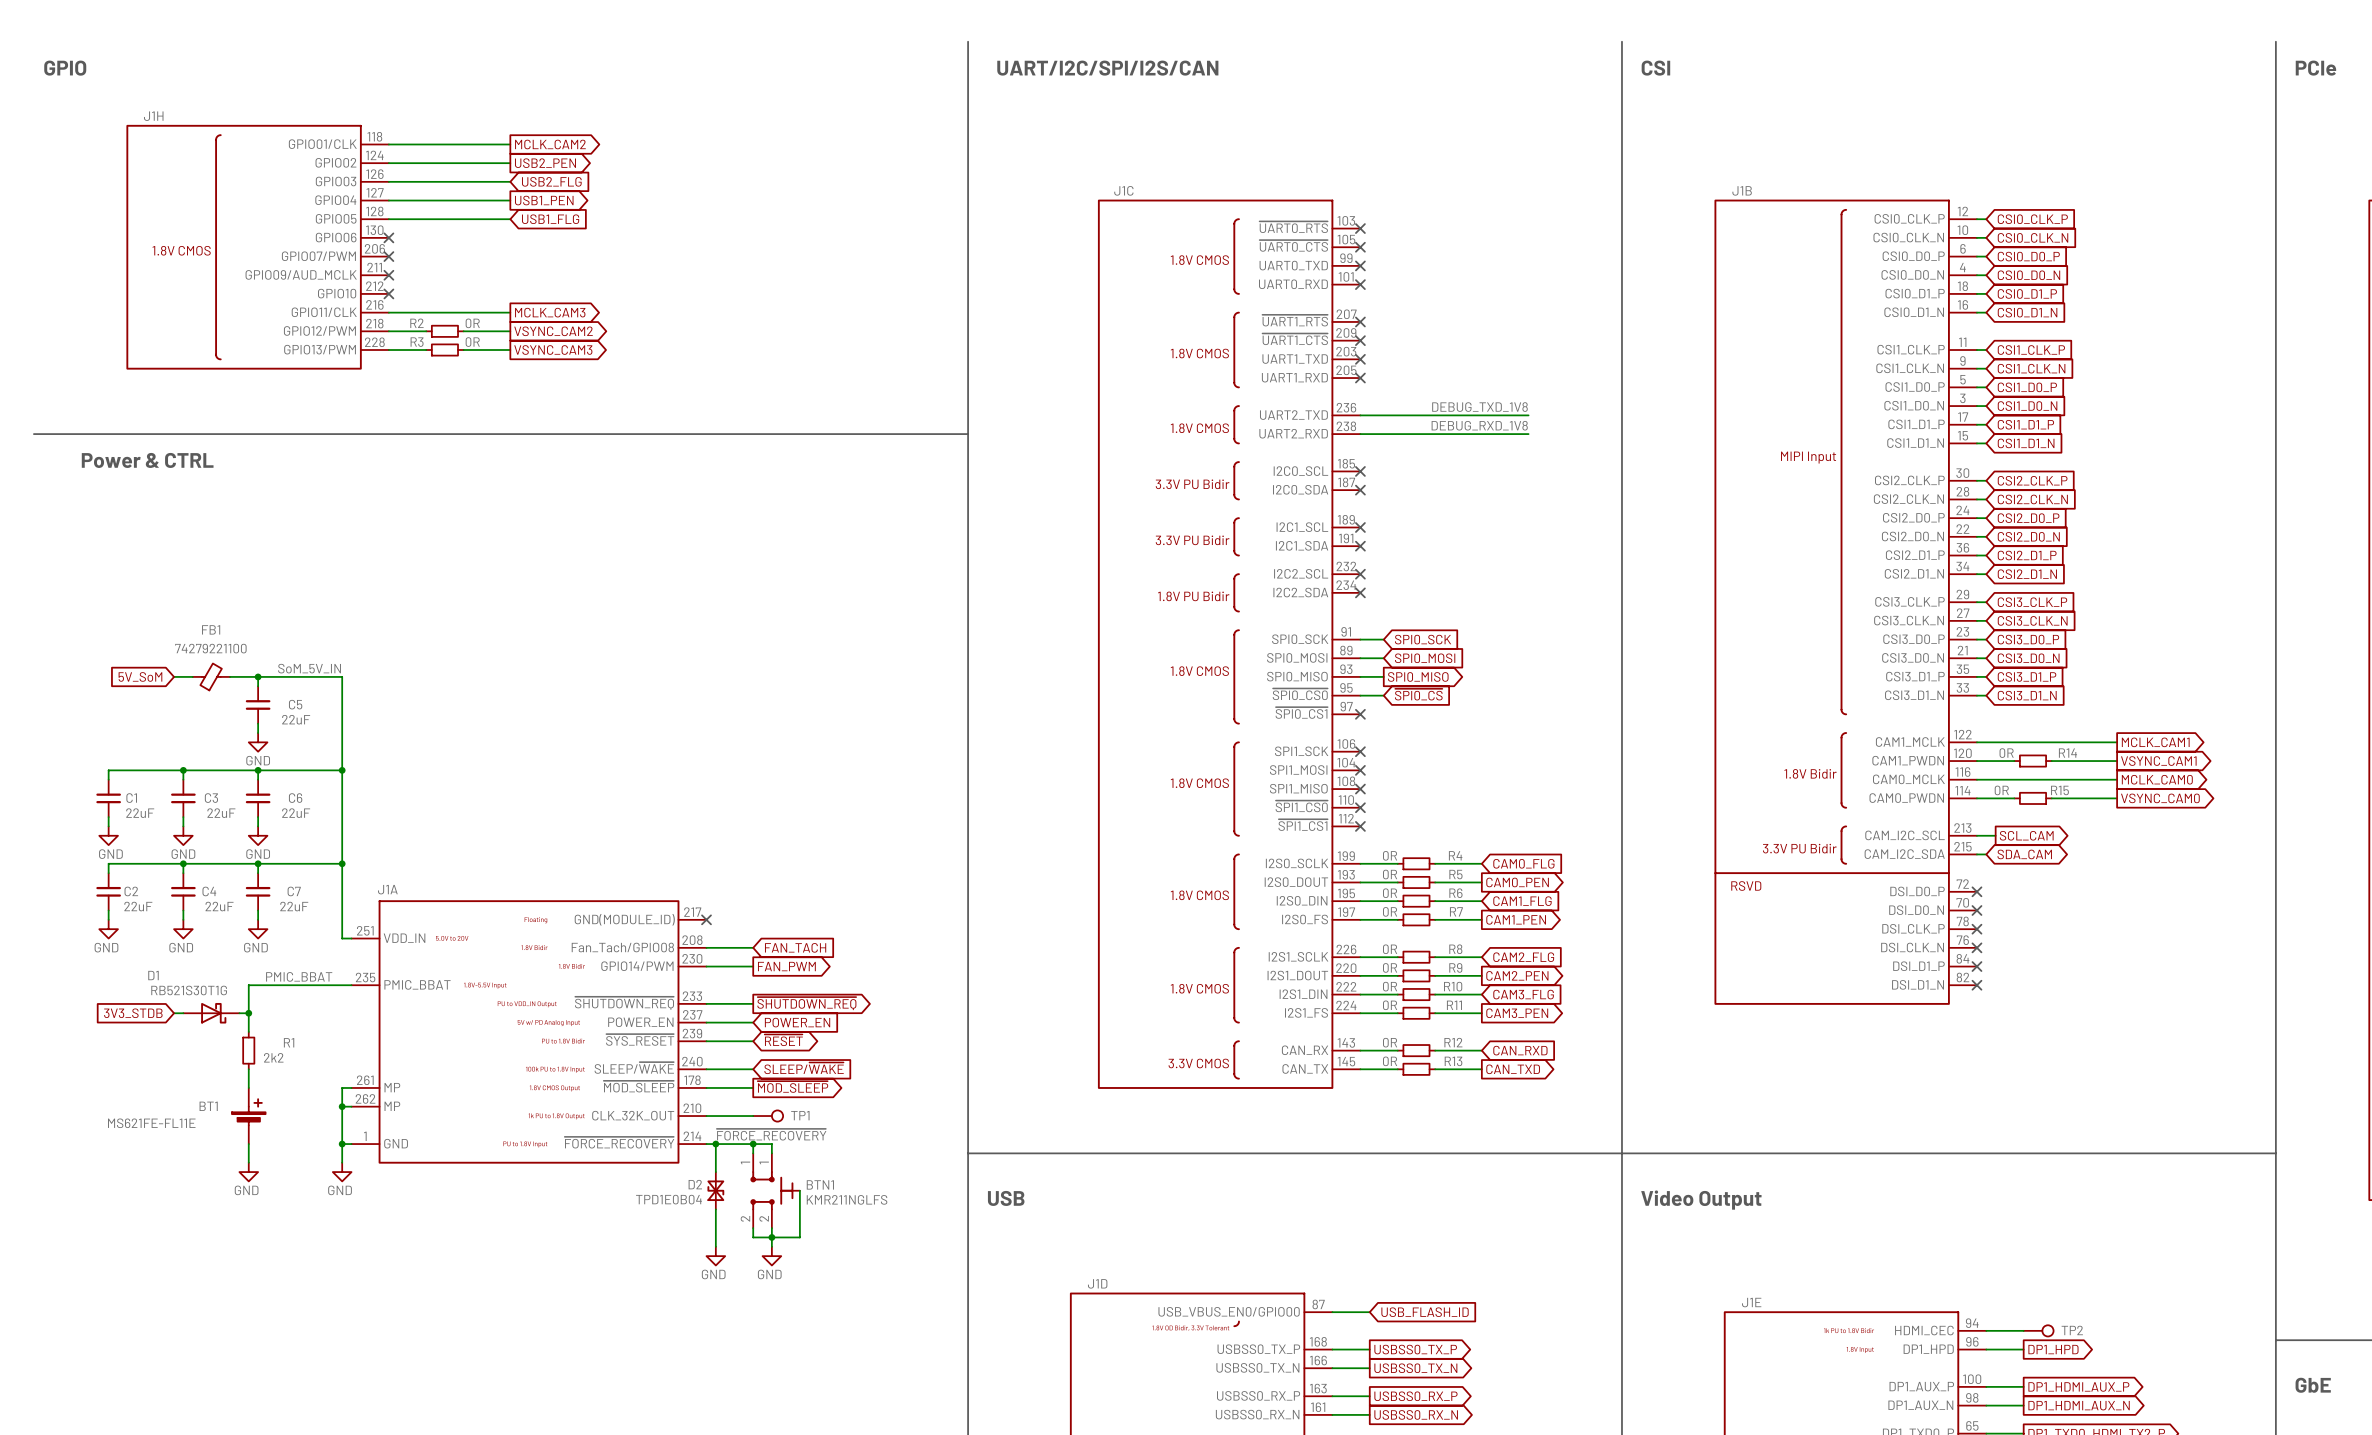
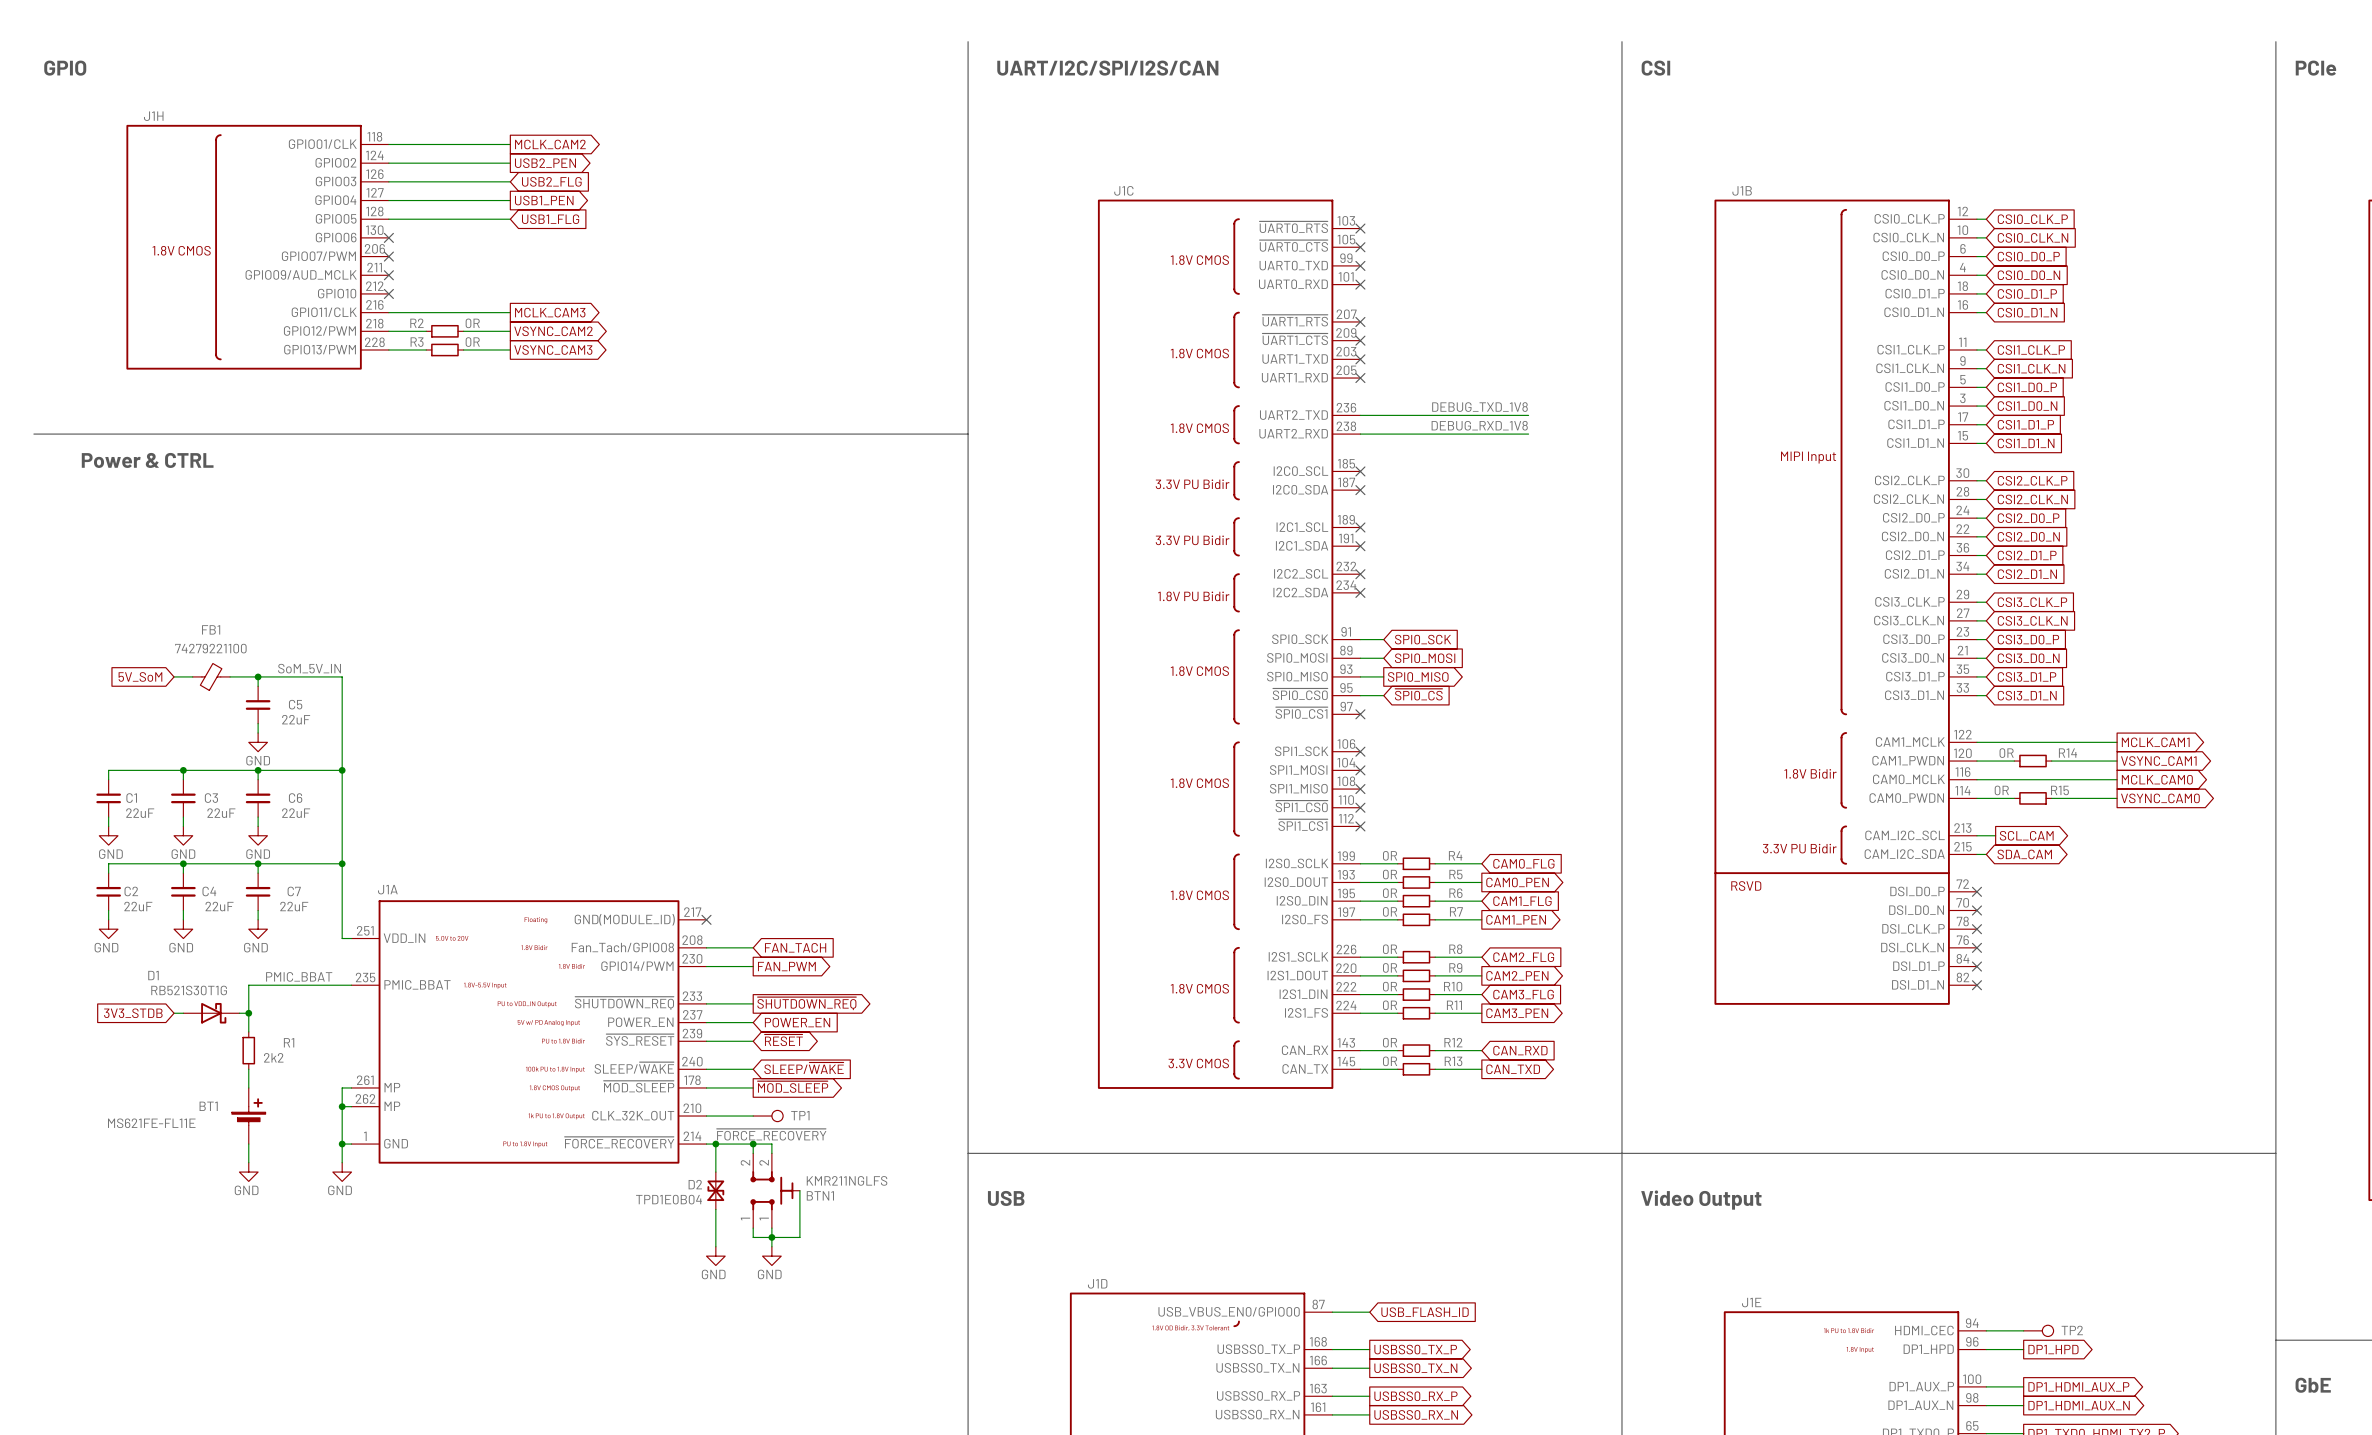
BTN1 flip: as is (771, 1190) -> up-down (771, 1190)

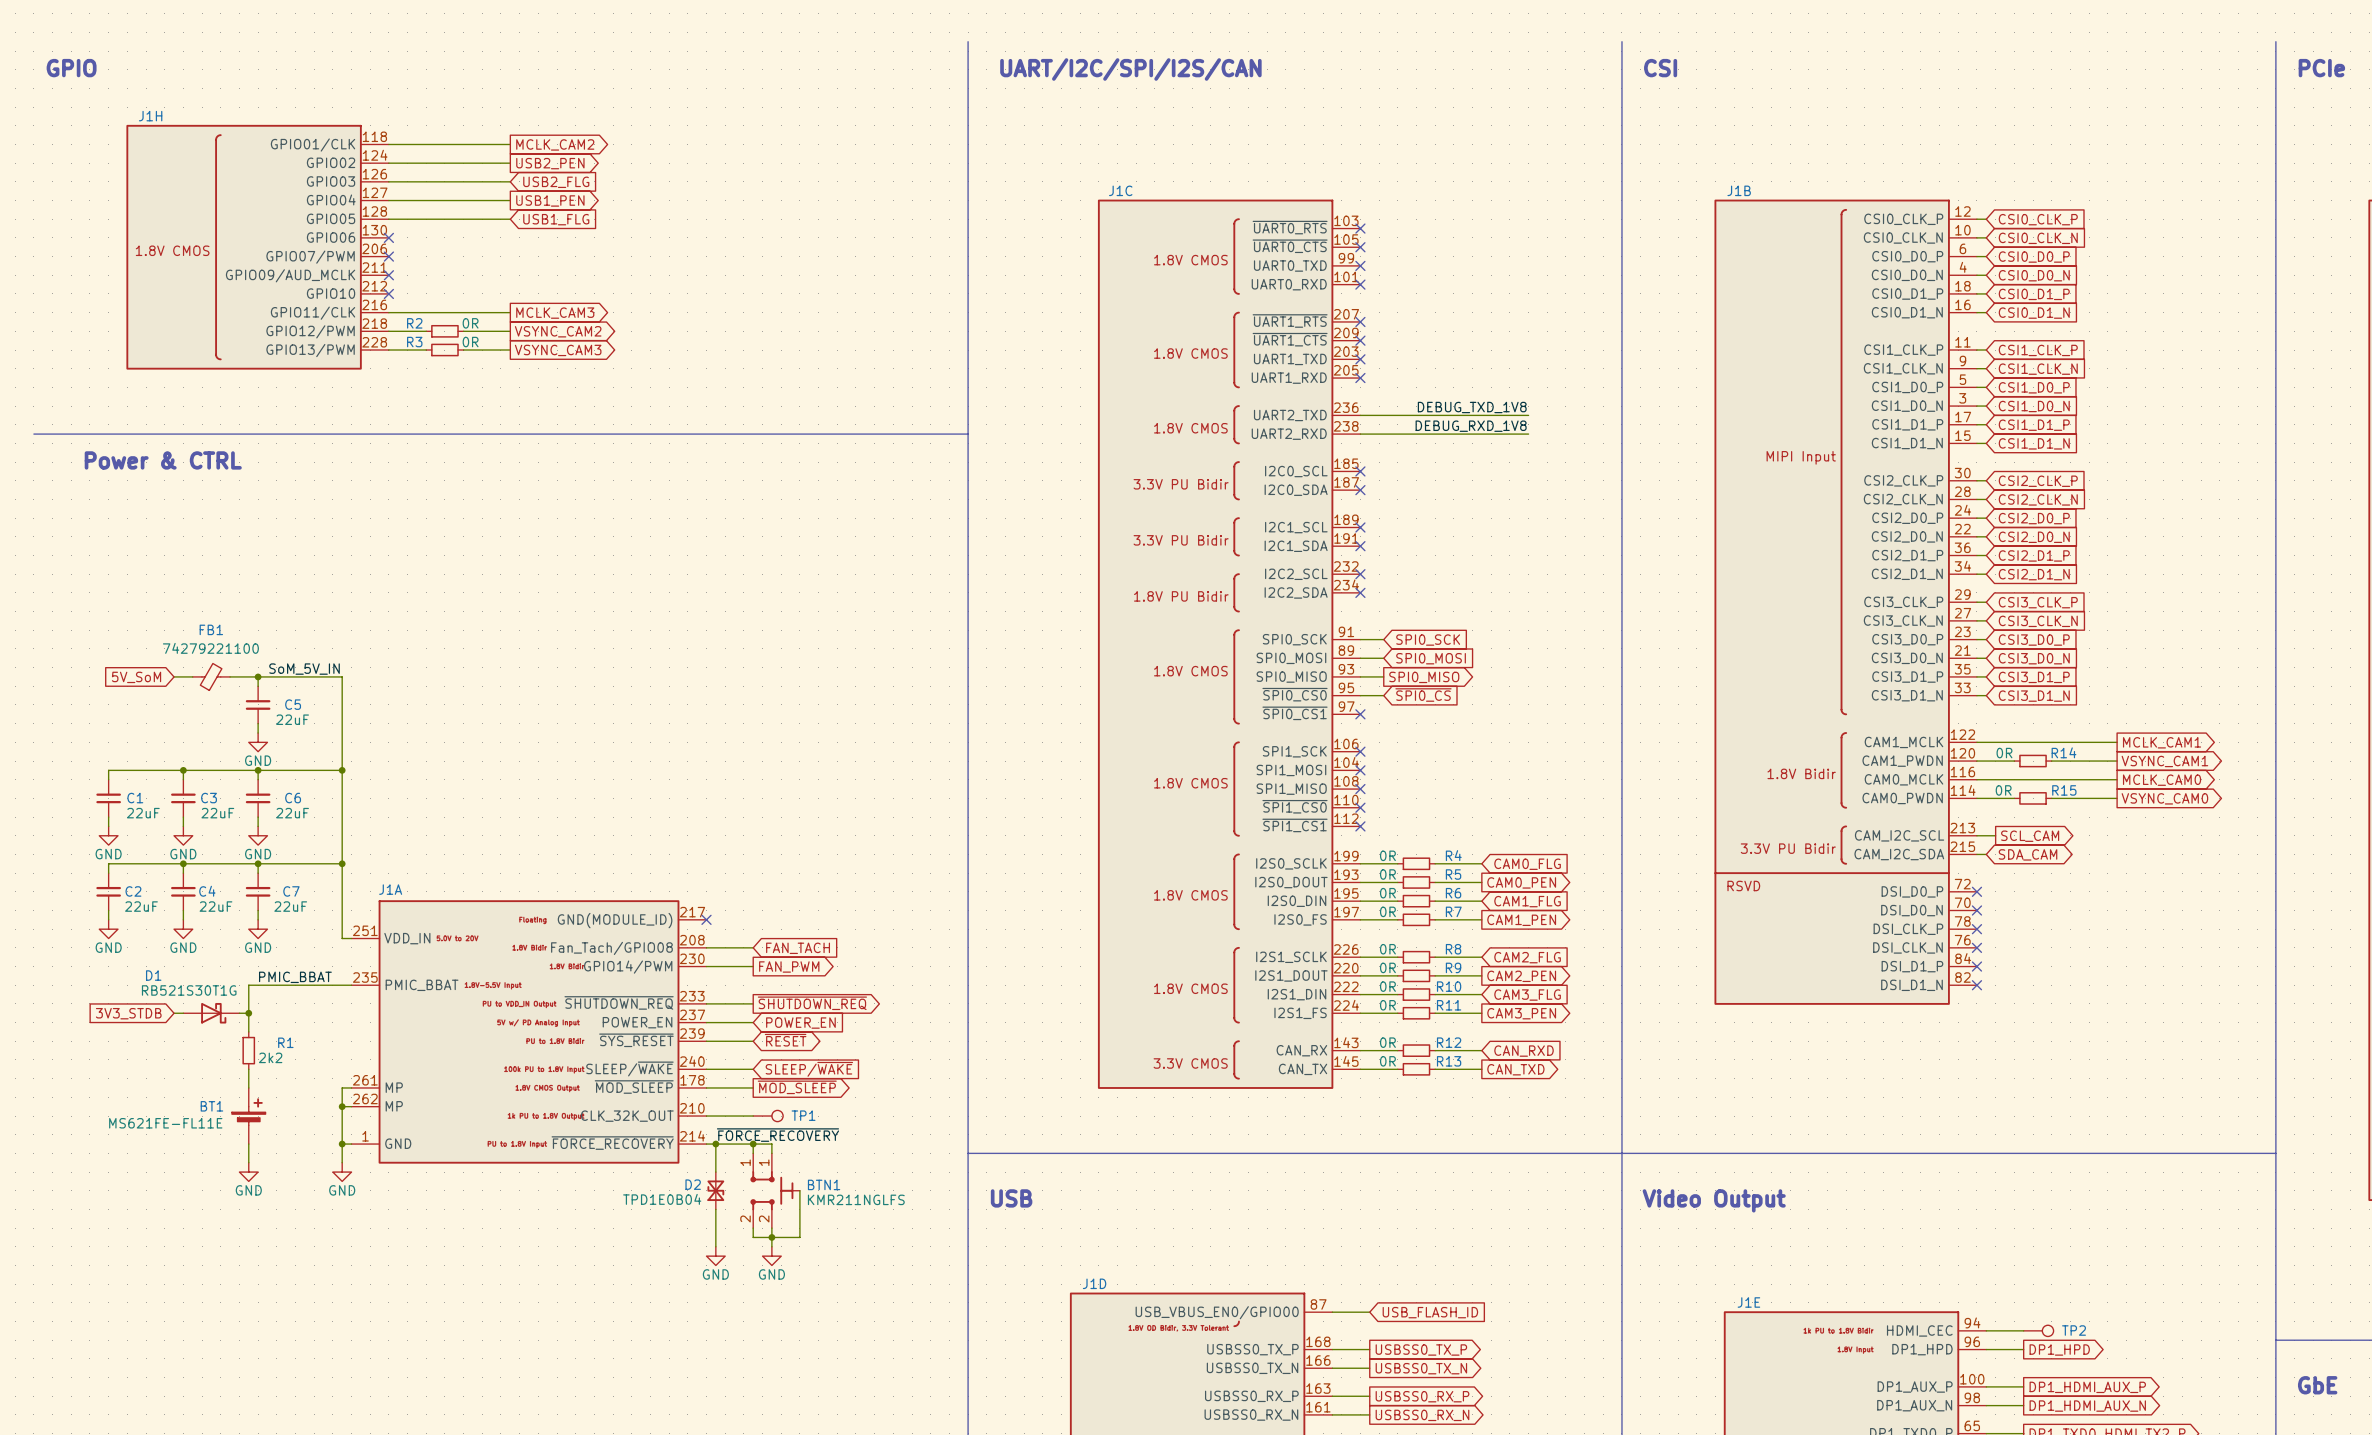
BTN1 flip: as is (771, 1190) -> up-down (771, 1190)

